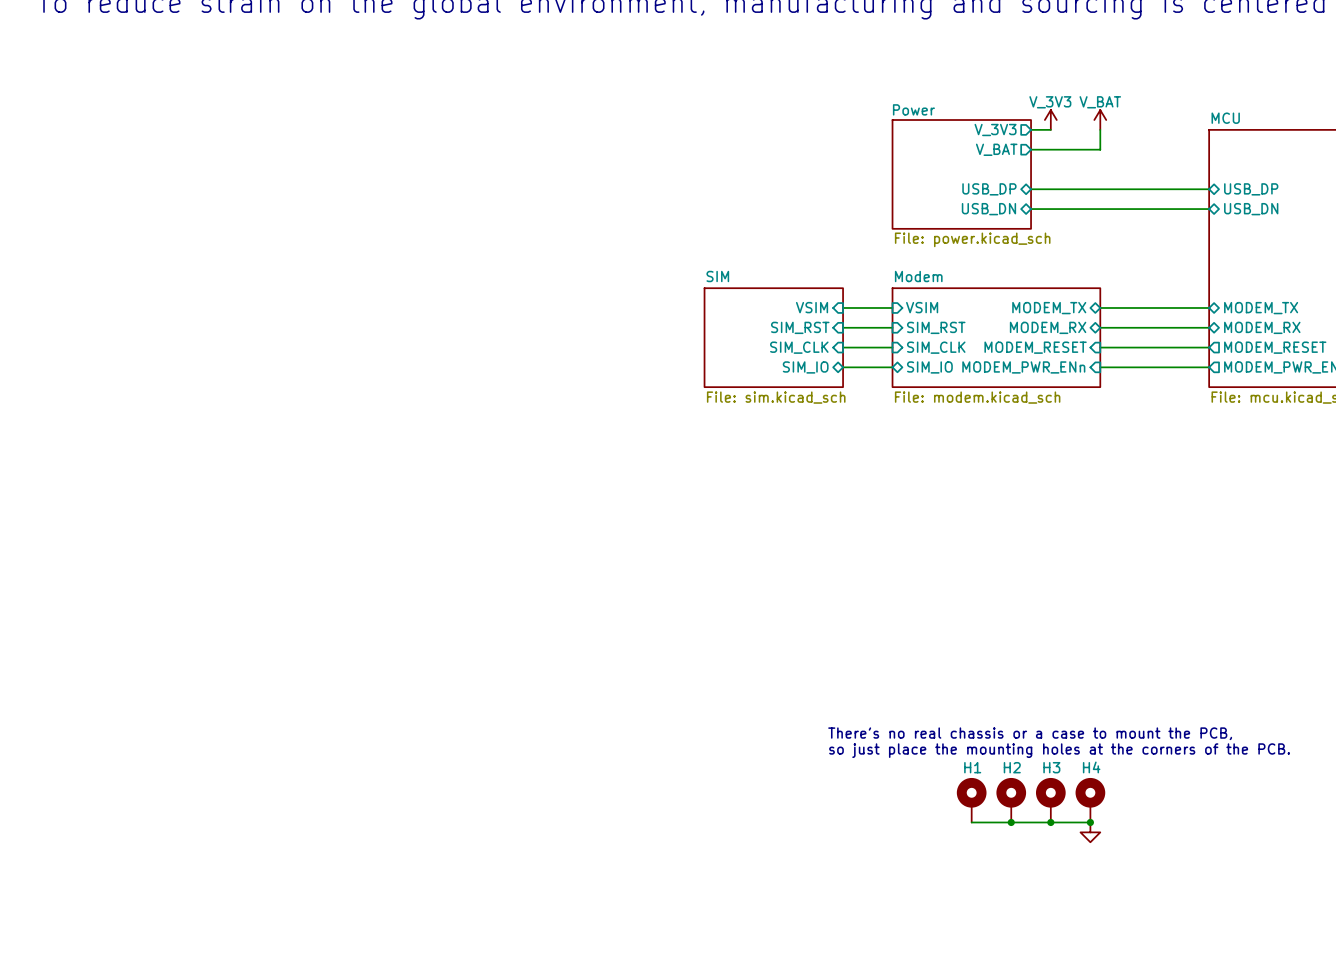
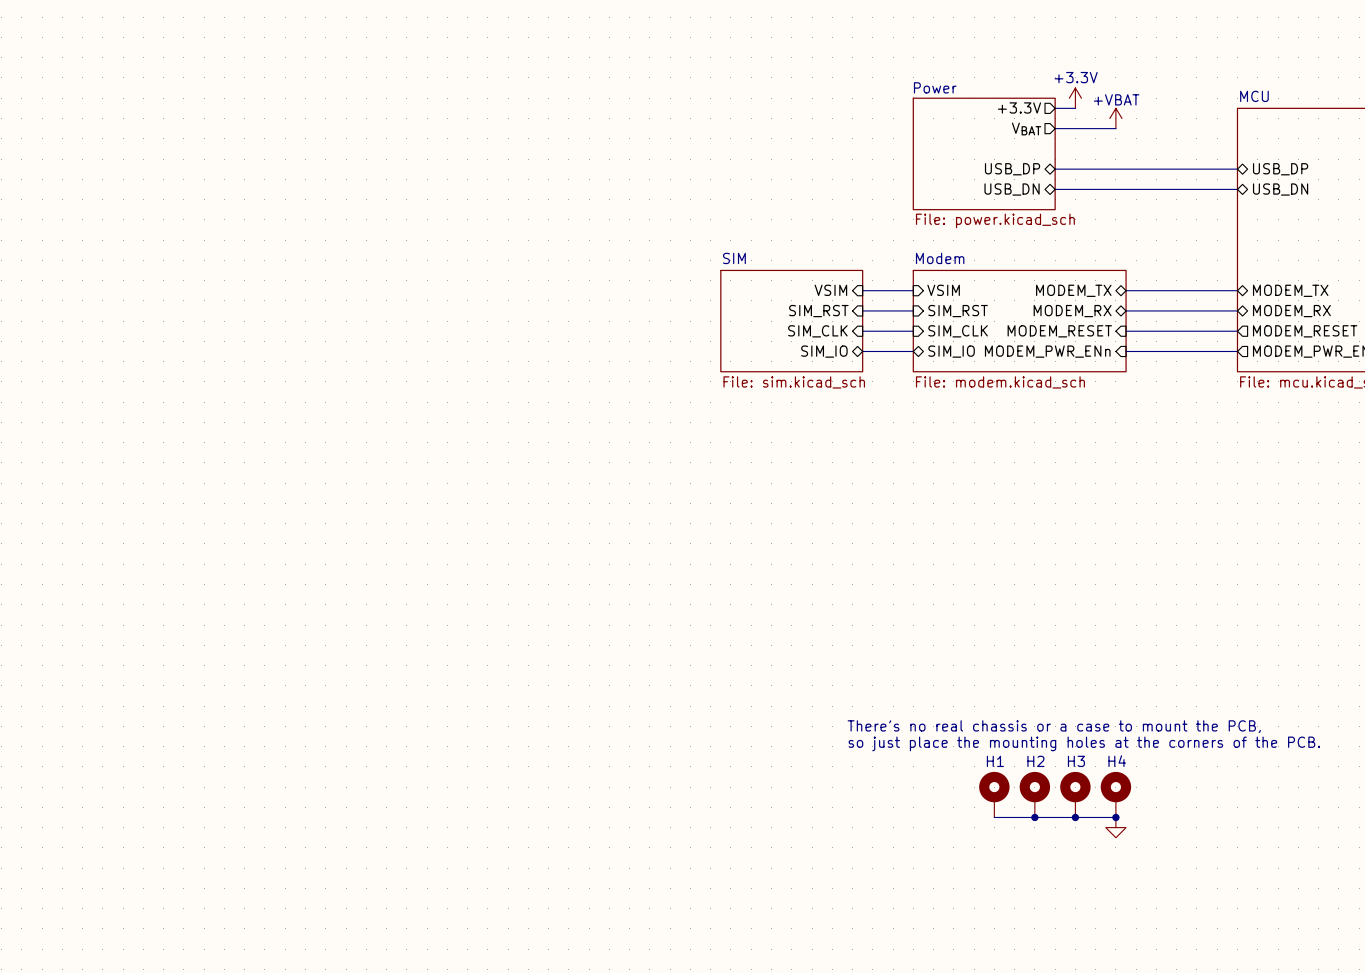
power symbol: V_3V3 (1050, 120) -> +3.3V (1075, 98)
power symbol: V_BAT (1100, 120) -> none
wire: (1100, 129) (1100, 149) (1090, 149) -> none
sheet pin: V_3V3 (995, 130) -> +3.3V (1019, 107)
power symbol: none -> +VBAT (1115, 118)
sheet pin: V_BAT (996, 149) -> VBAT (1026, 129)

